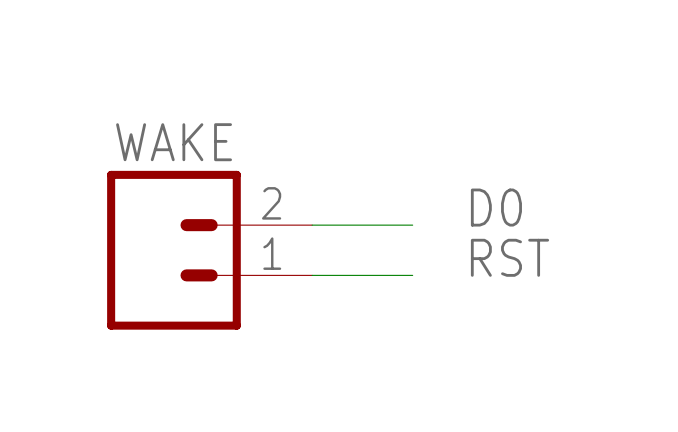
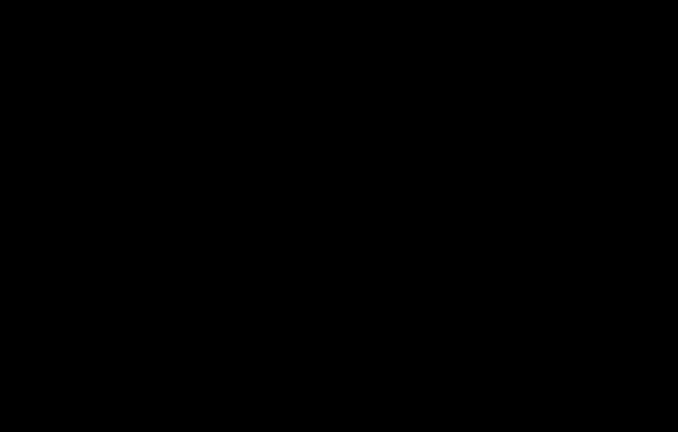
label: D0 (496, 207) -> none
wire: (312, 225) (412, 225) -> none
WAKE: (209, 250) -> none
label: RST (510, 257) -> none
wire: (312, 275) (412, 275) -> none

